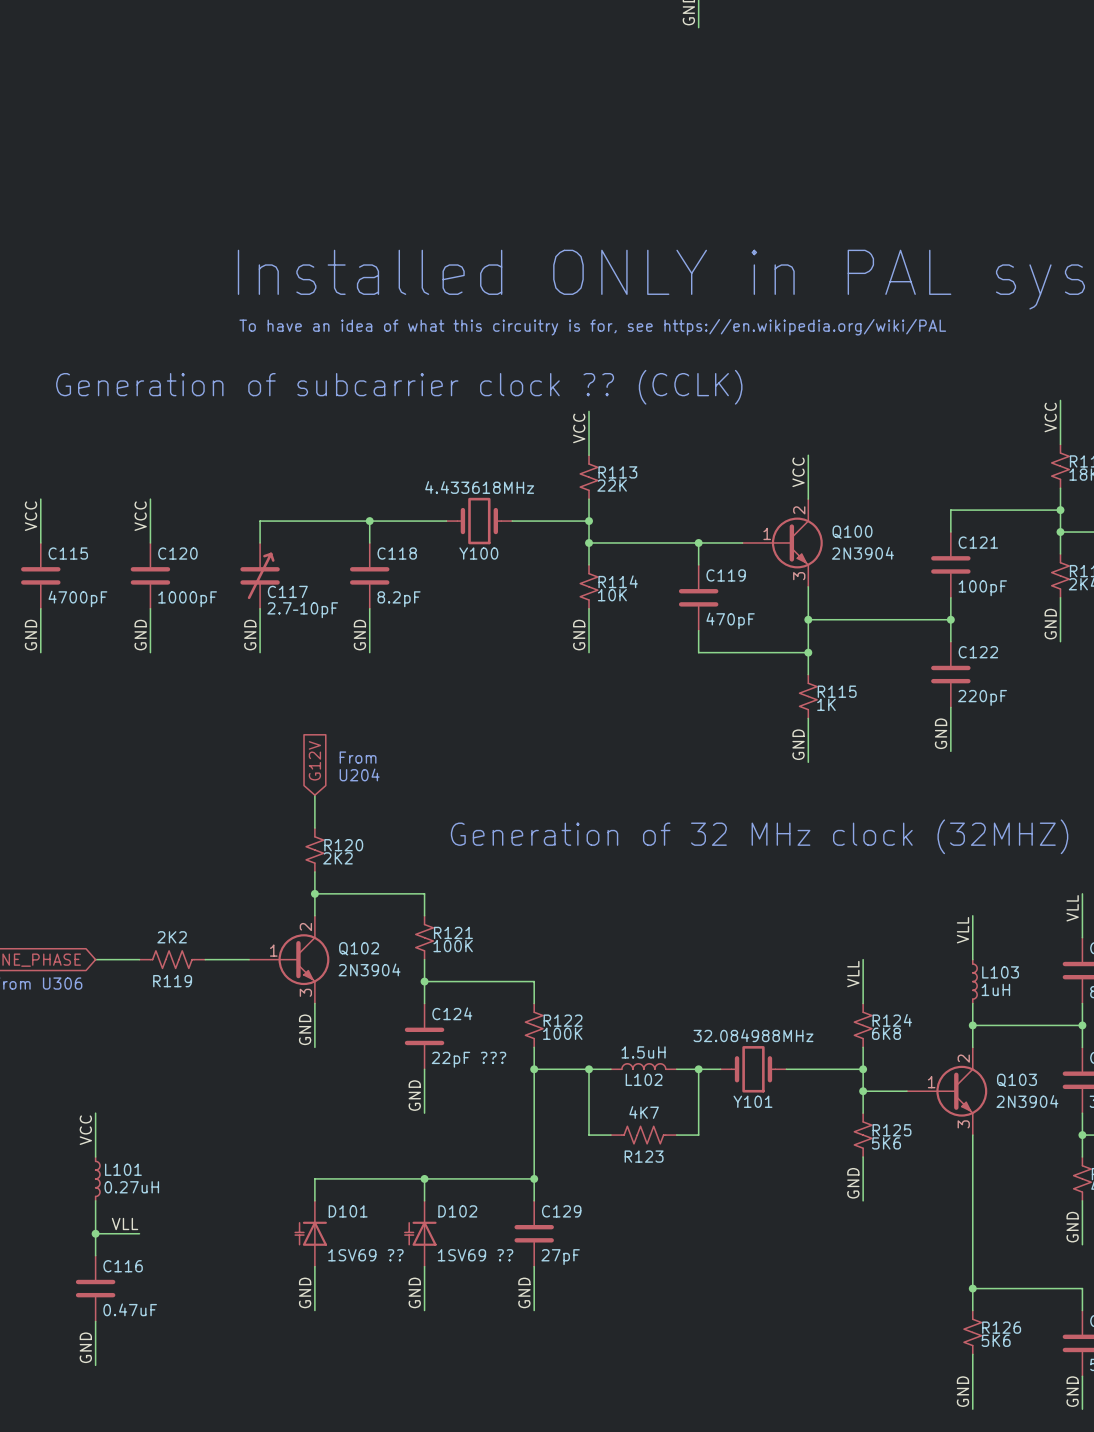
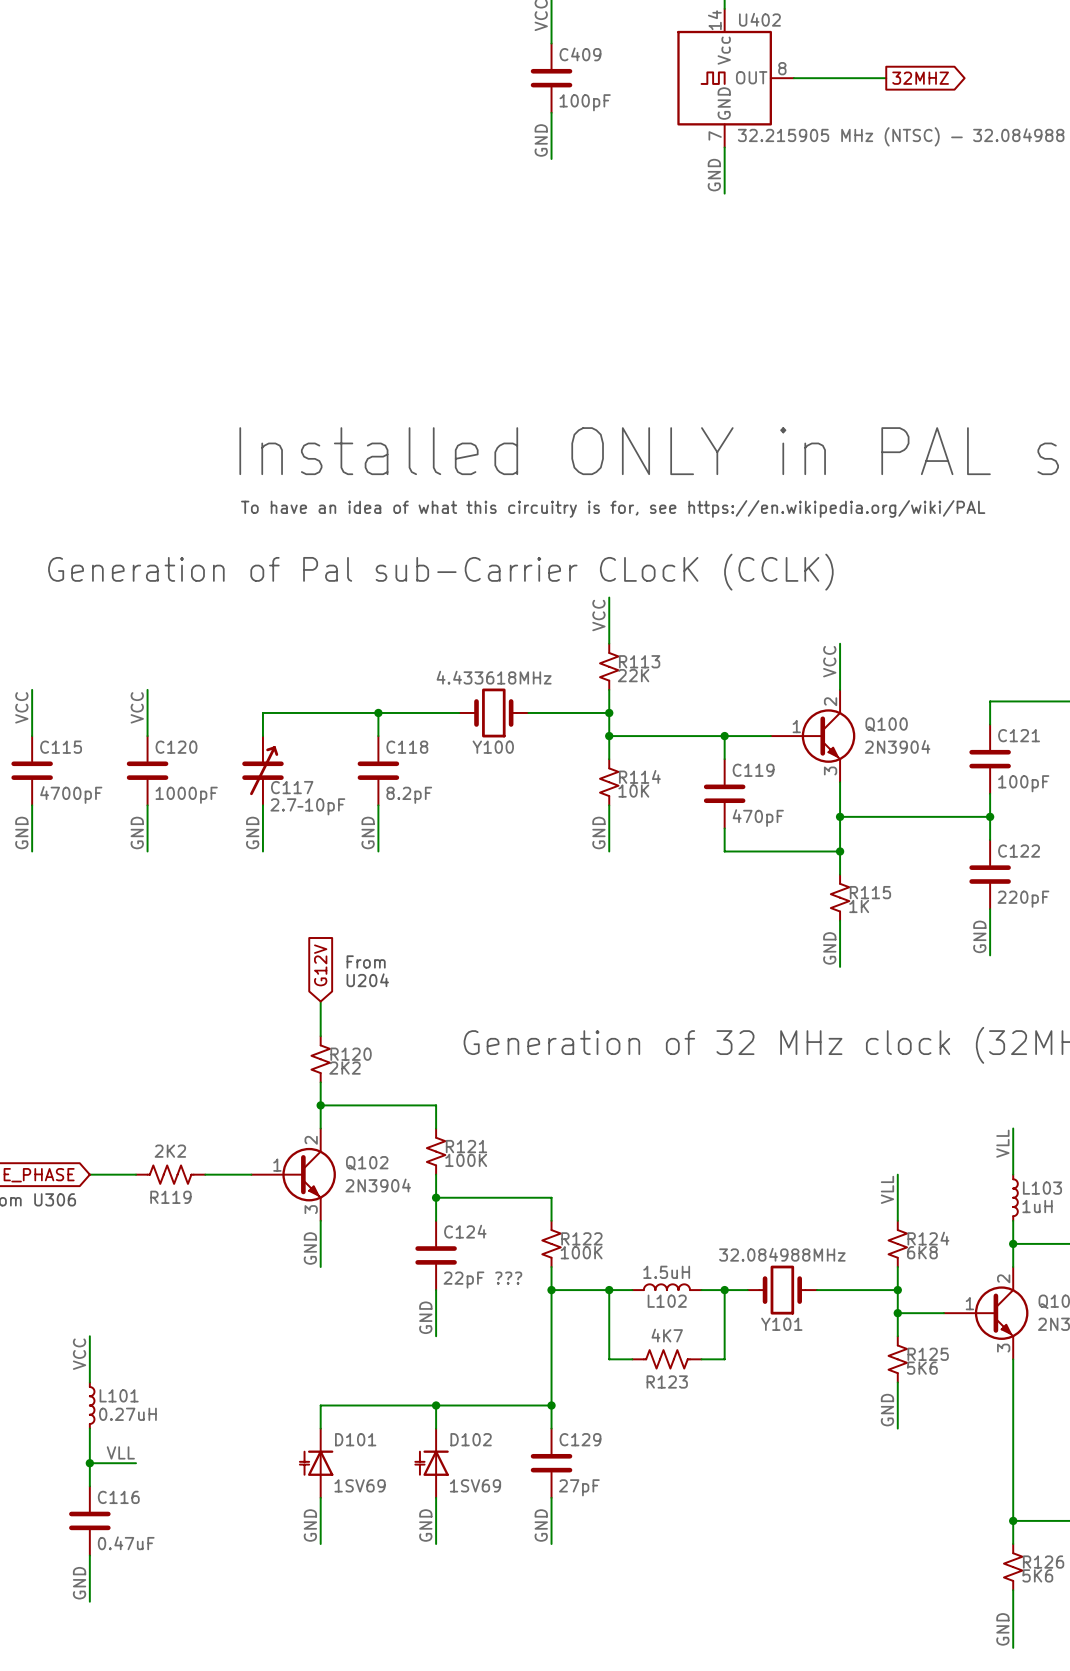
text: Generation of subcarrier clock ?? (CCLK) (399, 387) -> Generation of Pal sub-Carrier CLocK (CCLK) (440, 572)
D101 value: 1SV69 ?? (365, 1255) -> 1SV69 (360, 1485)
D102 value: 1SV69 ?? (475, 1255) -> 1SV69 (475, 1485)

